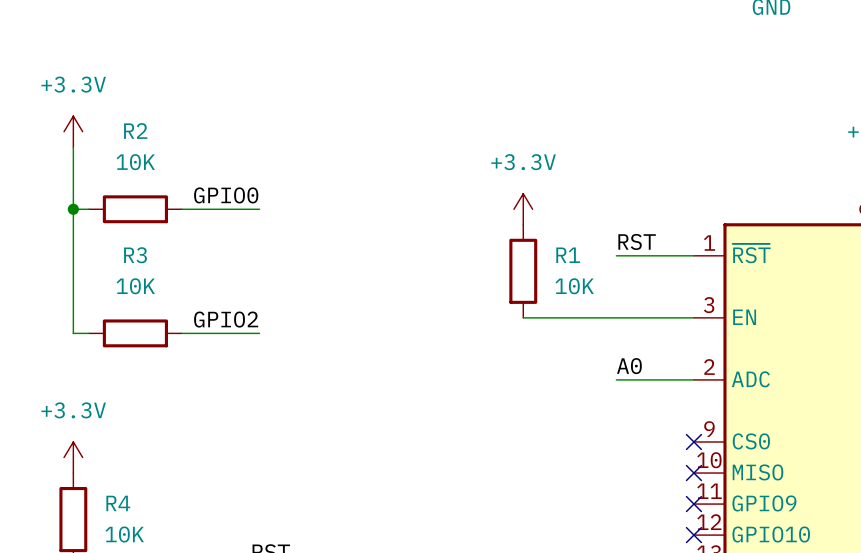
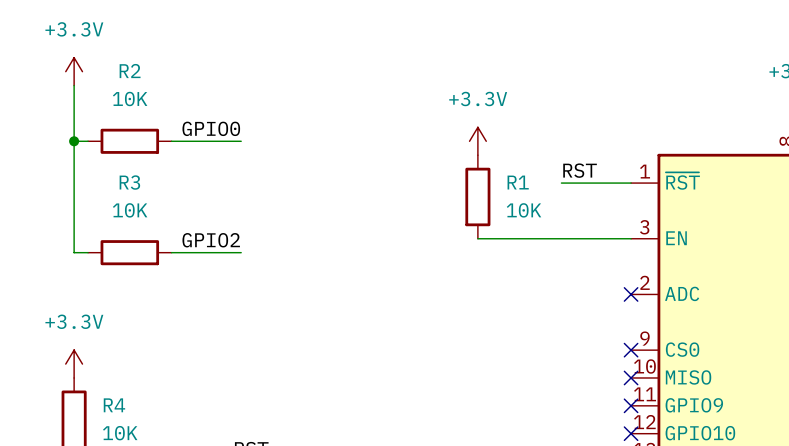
label: A0 (629, 366) -> none
wire: (616, 379) (693, 379) -> none
no-connect mark: none -> (631, 294)

